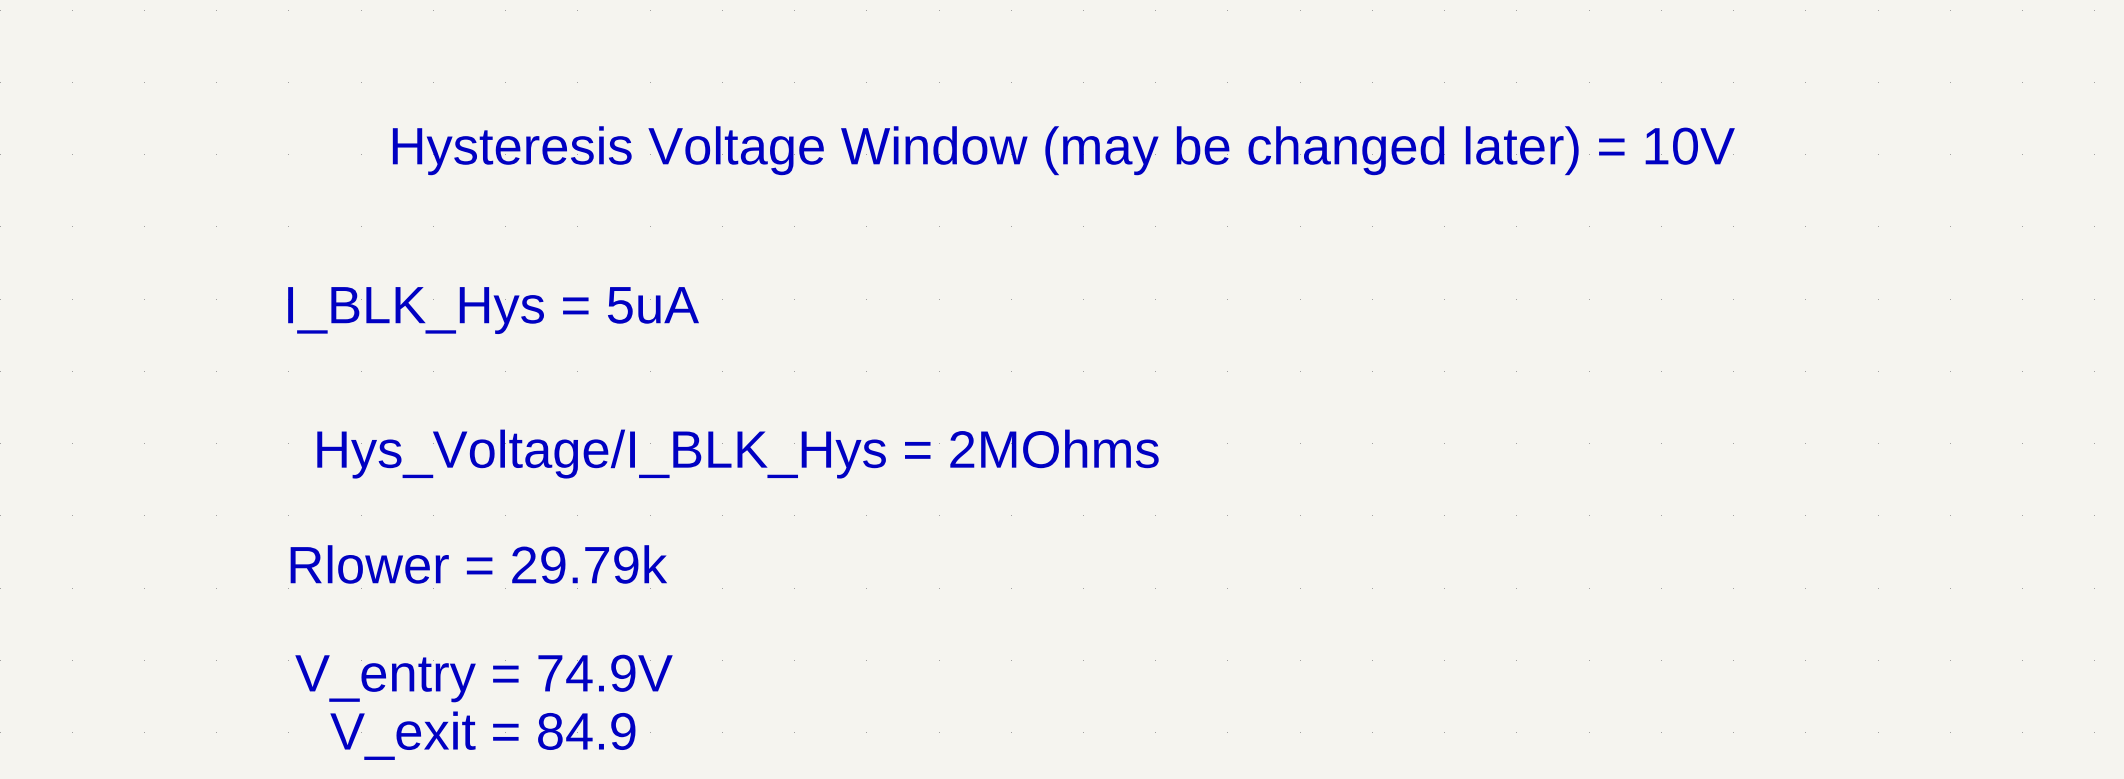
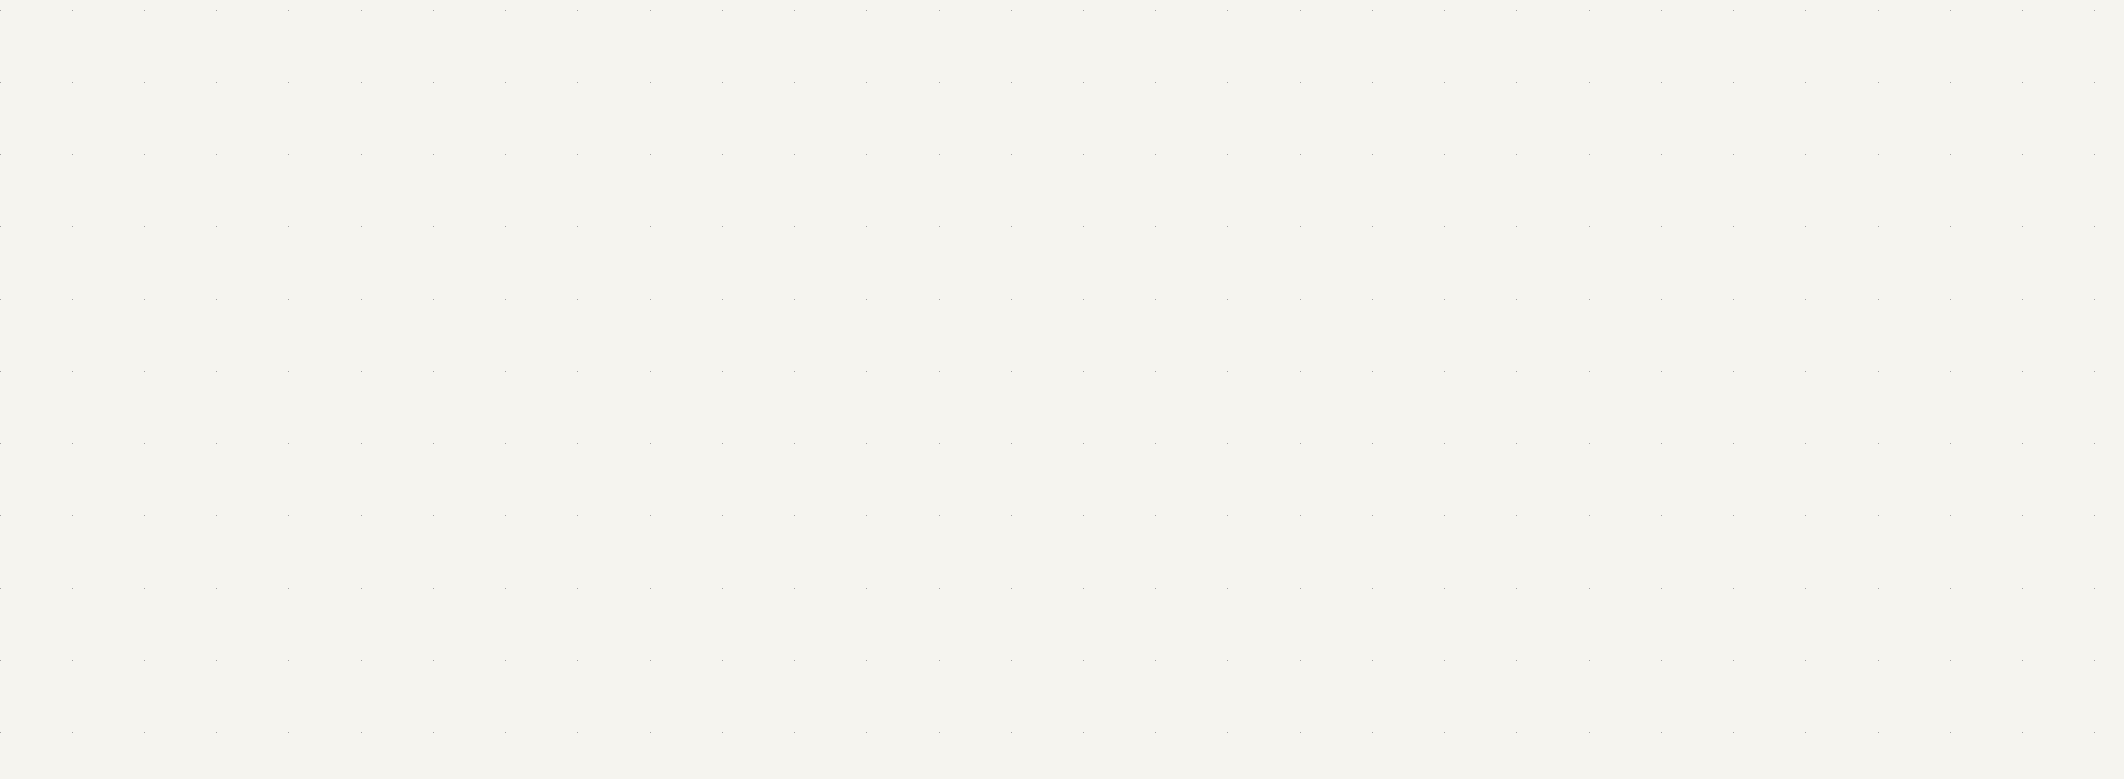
text: Hysteresis Voltage Window (may be changed later) = 10V (1063, 150) -> none
text: I_BLK_Hys = 5uA (493, 310) -> none
text: Hys_Voltage/I_BLK_Hys = 2MOhms (738, 454) -> none
text: Rlower = 29.79k (478, 564) -> none
text: V_entry = 74.9V (484, 678) -> none
text: V_exit = 84.9 (482, 735) -> none

